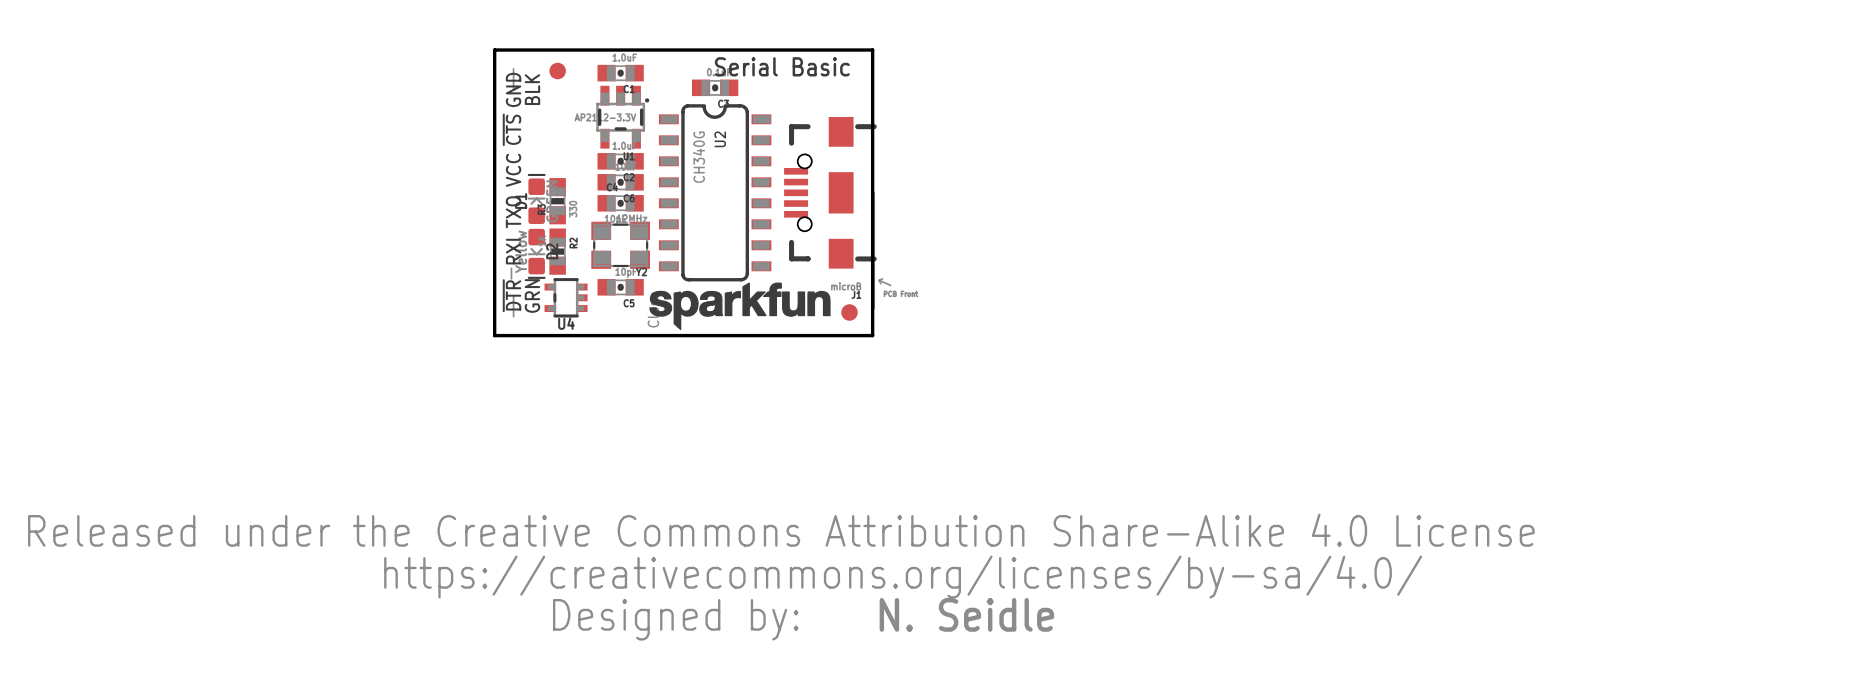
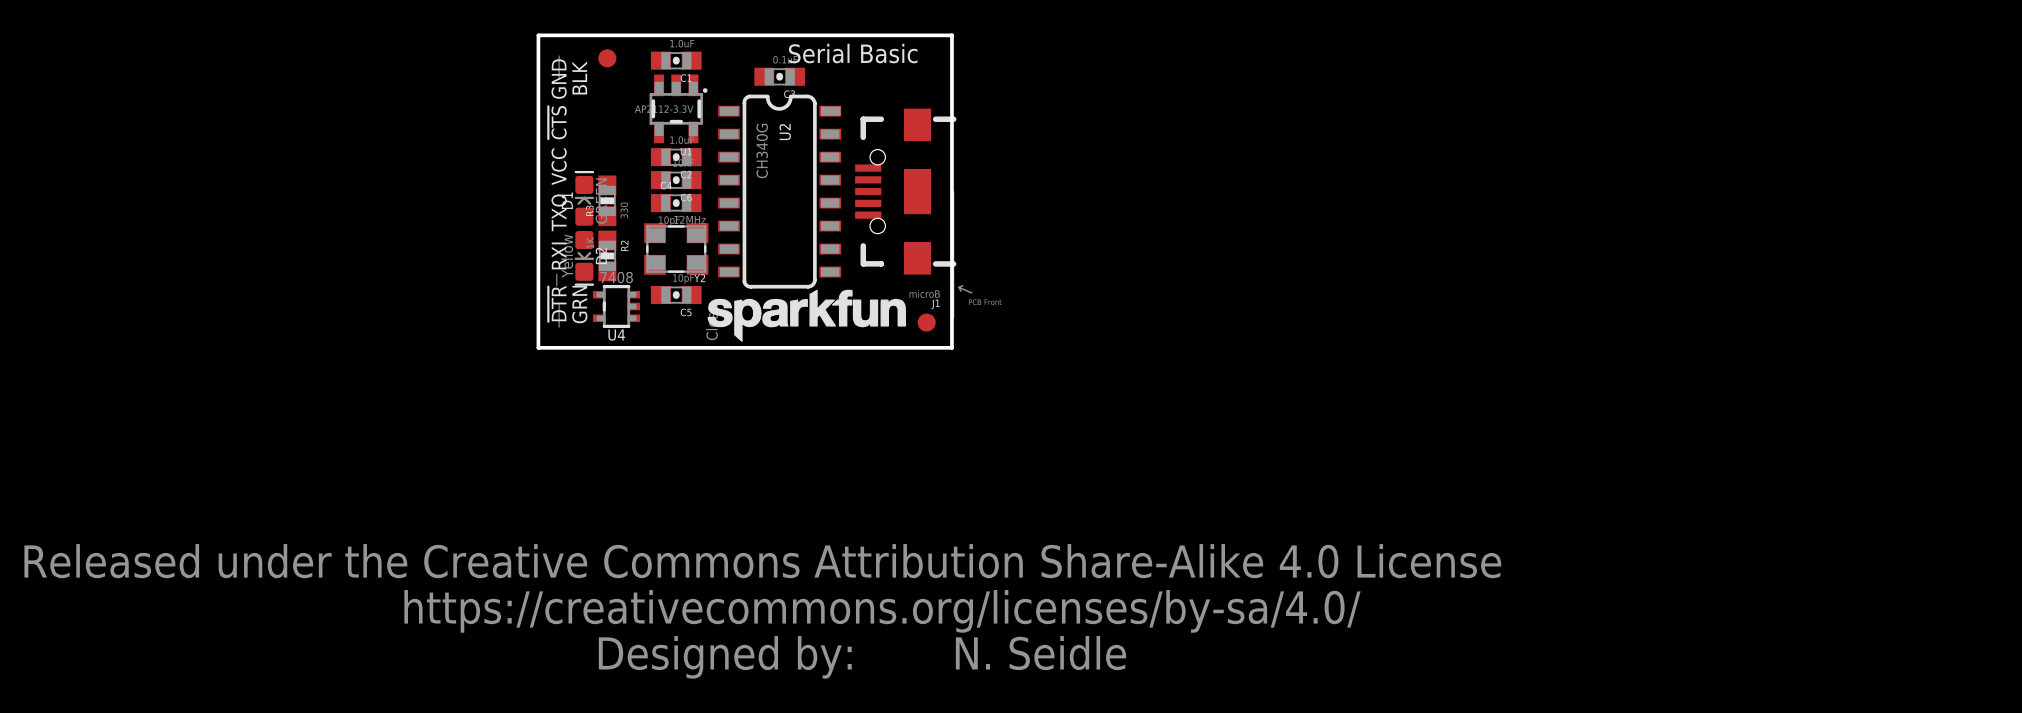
U4 value: none -> 7408 (616, 277)

